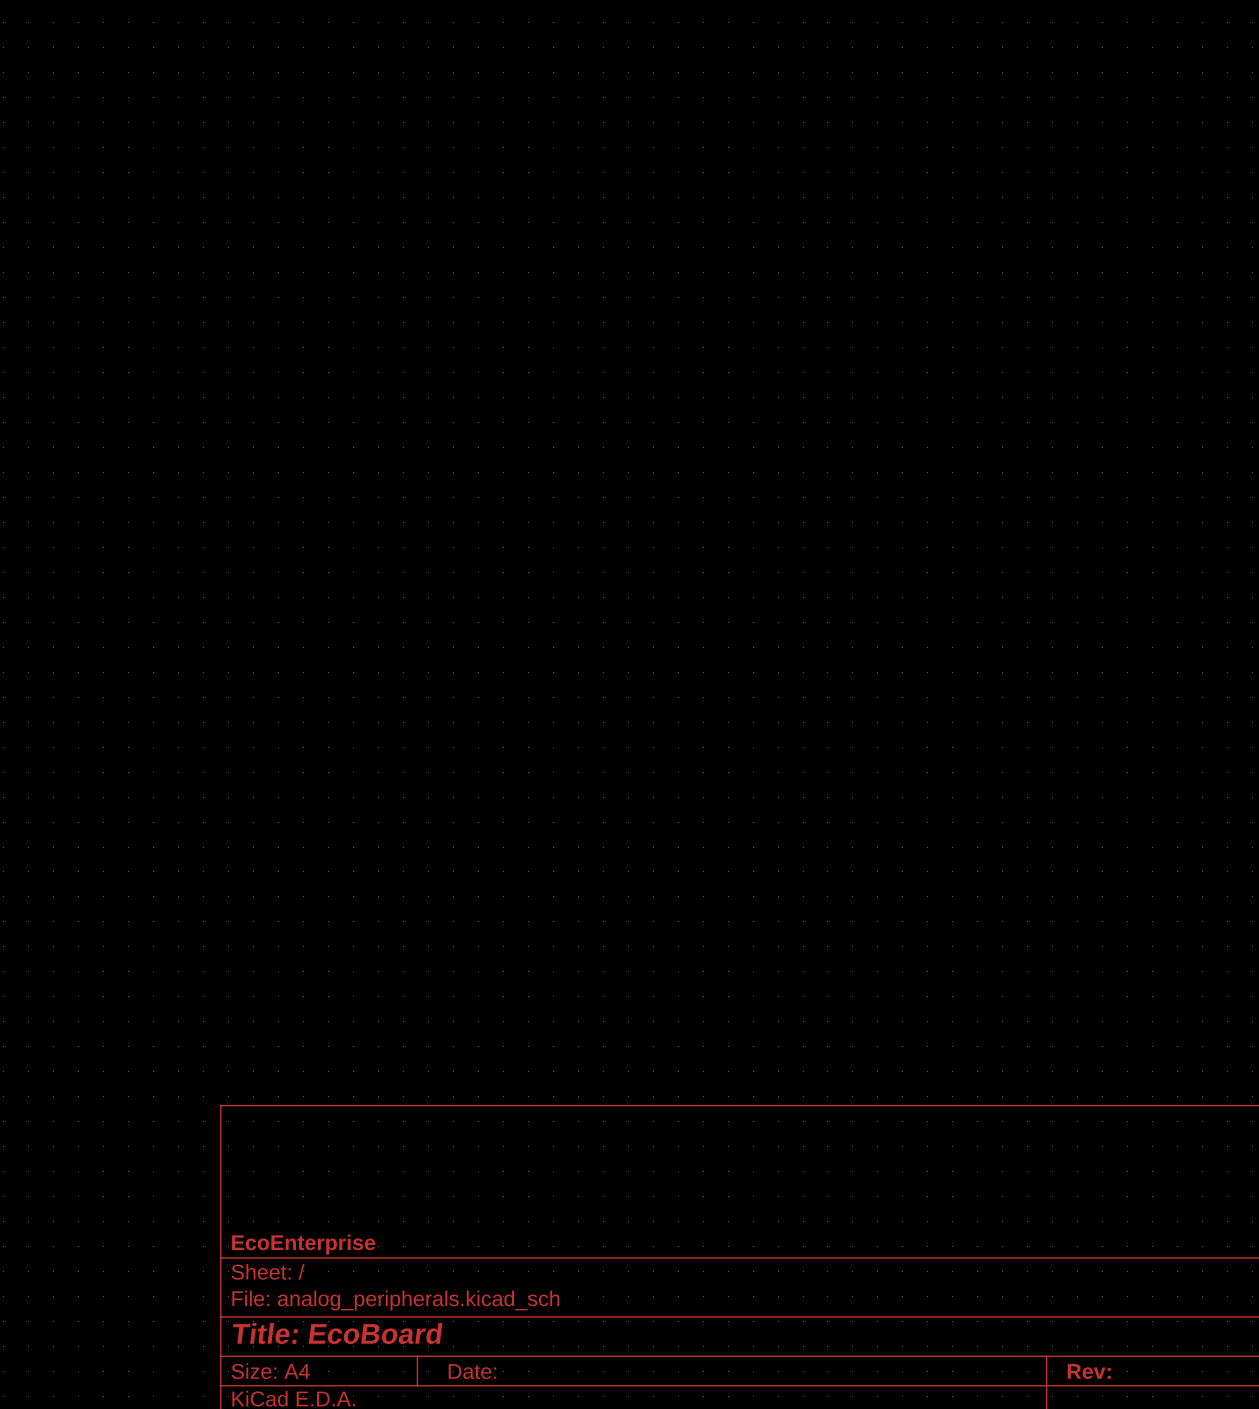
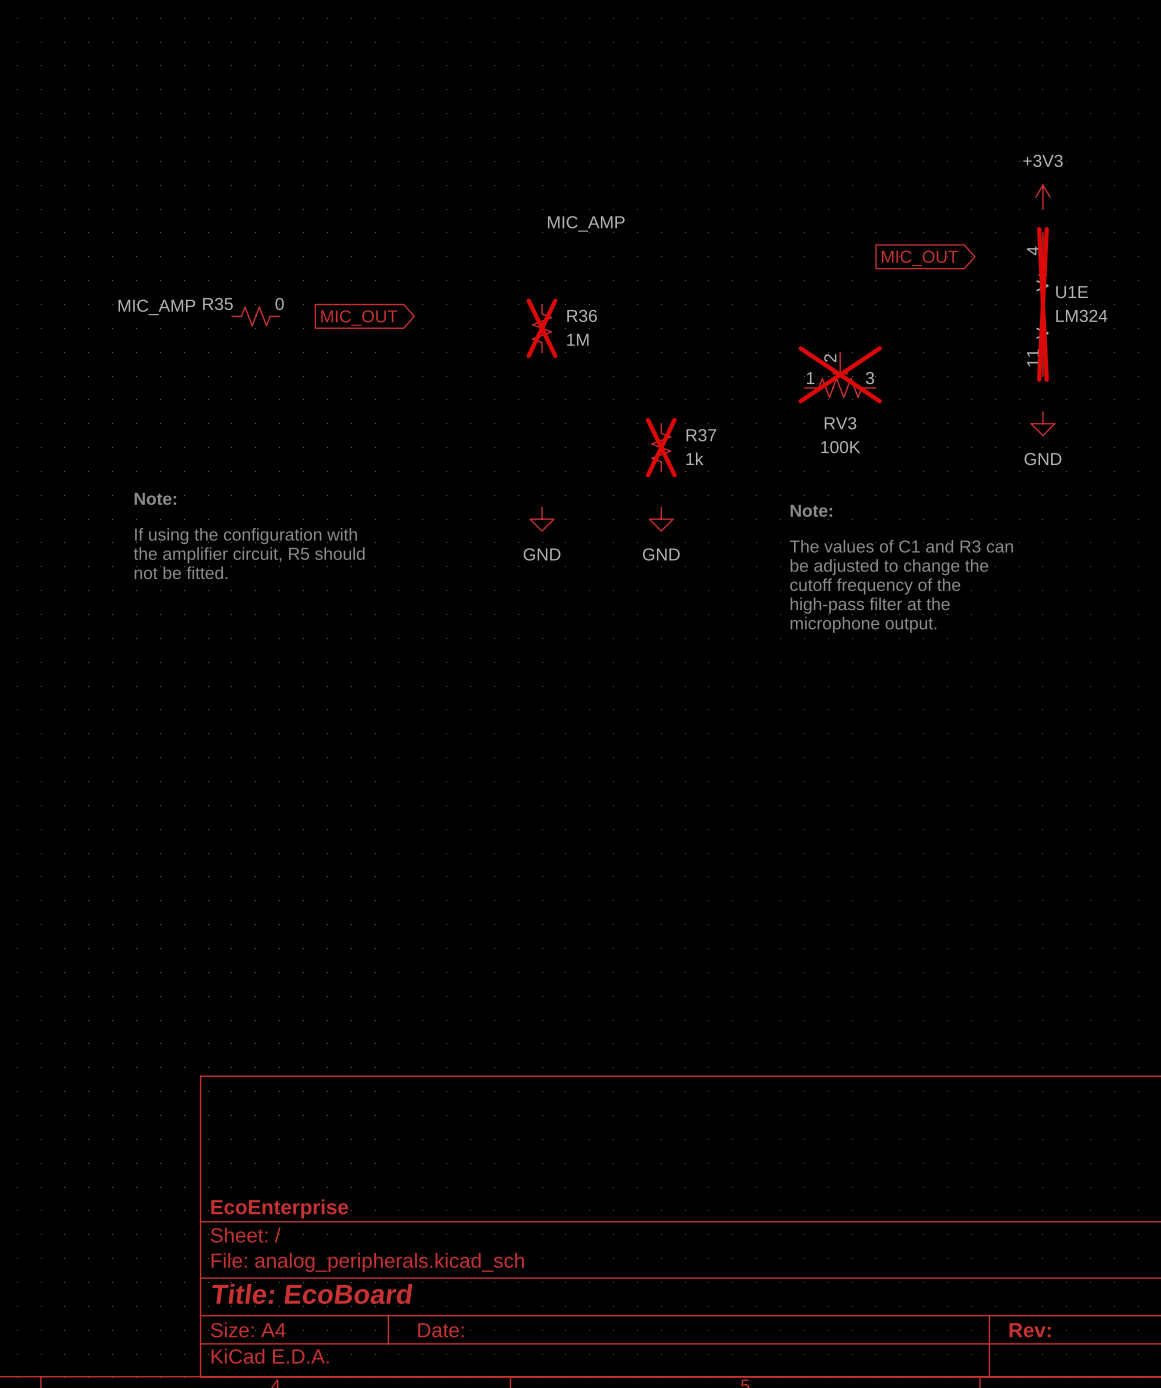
power symbol: none -> +3V3 (1042, 197)
label: none -> MIC_AMP (586, 223)
global label: none -> MIC_OUT (919, 258)
U1E: none -> LM324 (1042, 304)
label: none -> MIC_AMP (156, 307)
R35: none -> 0 (255, 316)
global label: none -> MIC_OUT (359, 318)
R36: none -> 1M (542, 328)
RV3: none -> 100K (840, 374)
power symbol: none -> GND (1042, 423)
R37: none -> 1k (661, 447)
text: none -> Note: (155, 498)
text: none -> Note: (811, 510)
power symbol: none -> GND (542, 519)
power symbol: none -> GND (661, 519)
text: none -> If using the configuration with (246, 536)
text: none -> The values of C1 and R3 can (901, 546)
text: none -> the amplifier circuit, R5 should (249, 555)
text: none -> be adjusted to change the (889, 567)
text: none -> not be fitted. (181, 572)
text: none -> cutoff frequency of the (875, 586)
text: none -> high-pass filter at the (870, 605)
text: none -> microphone output. (863, 624)

